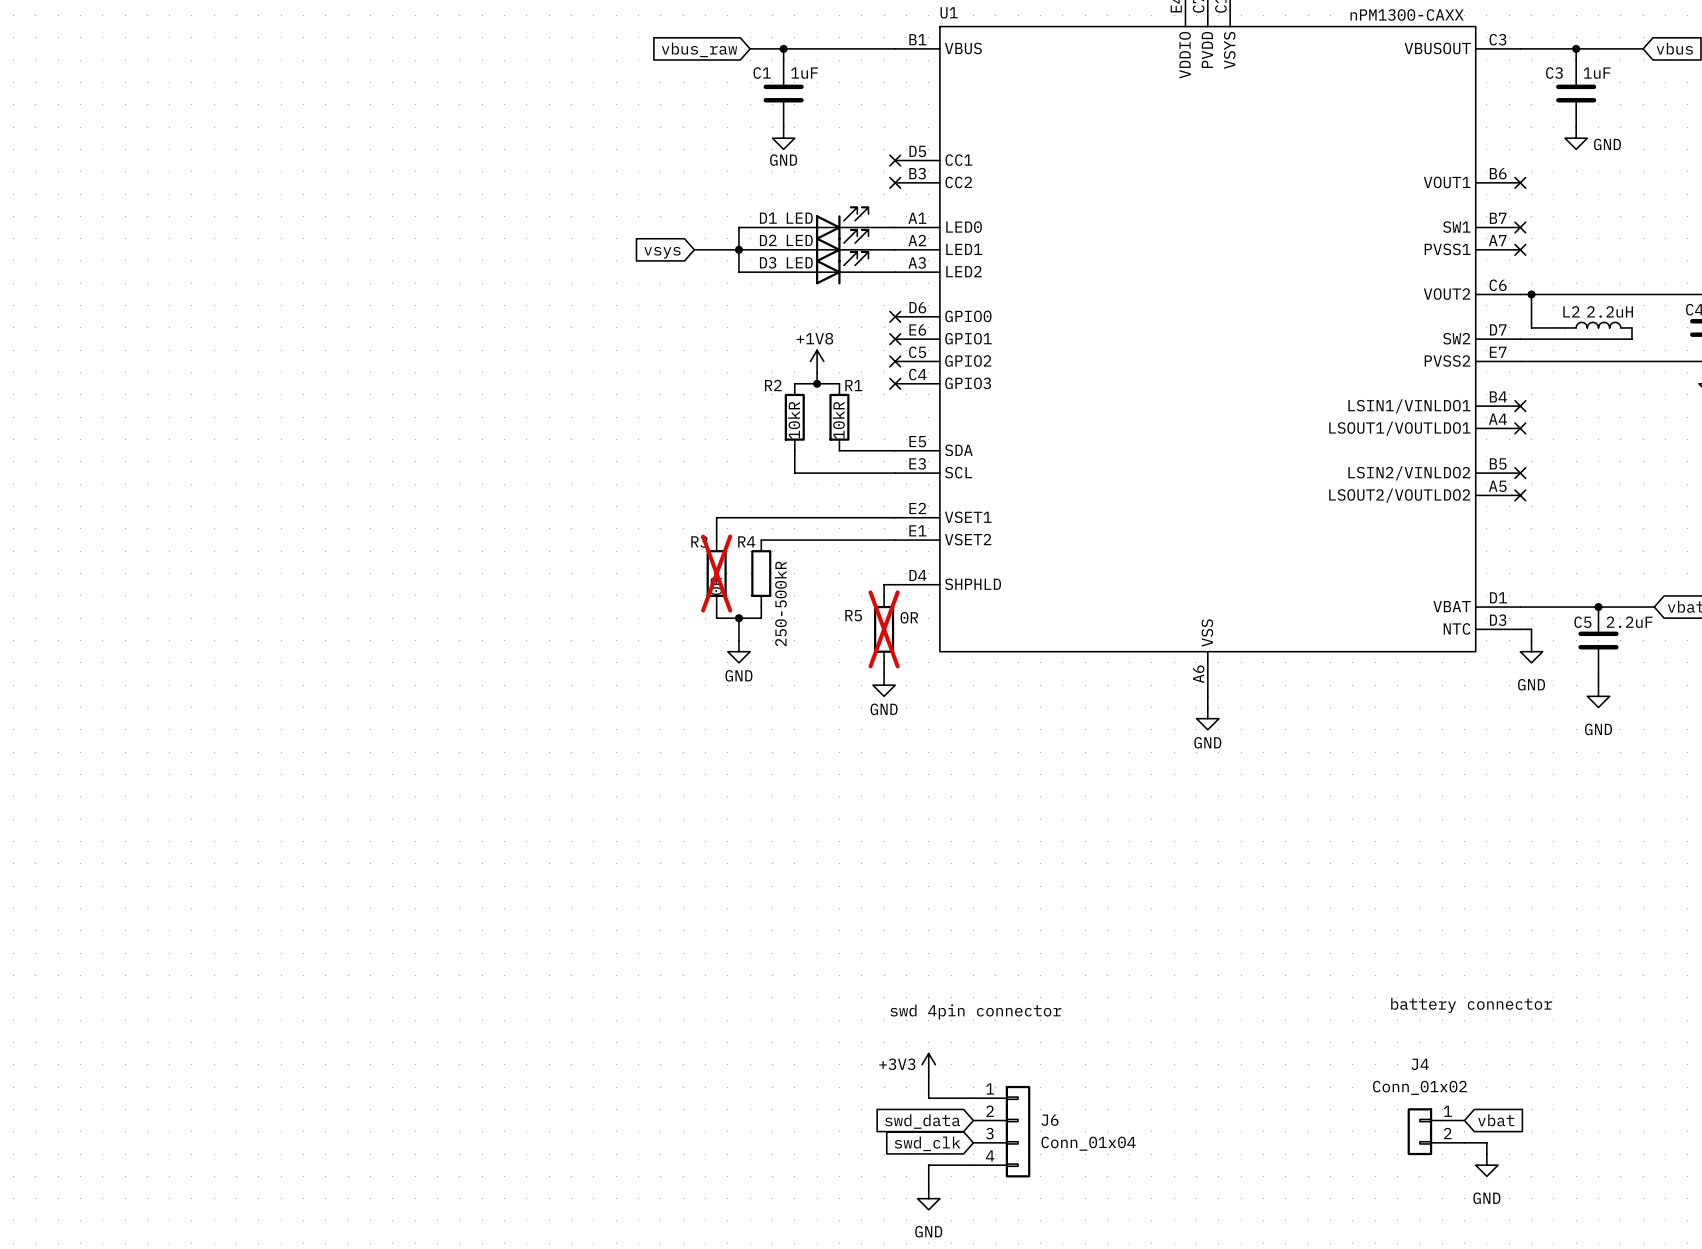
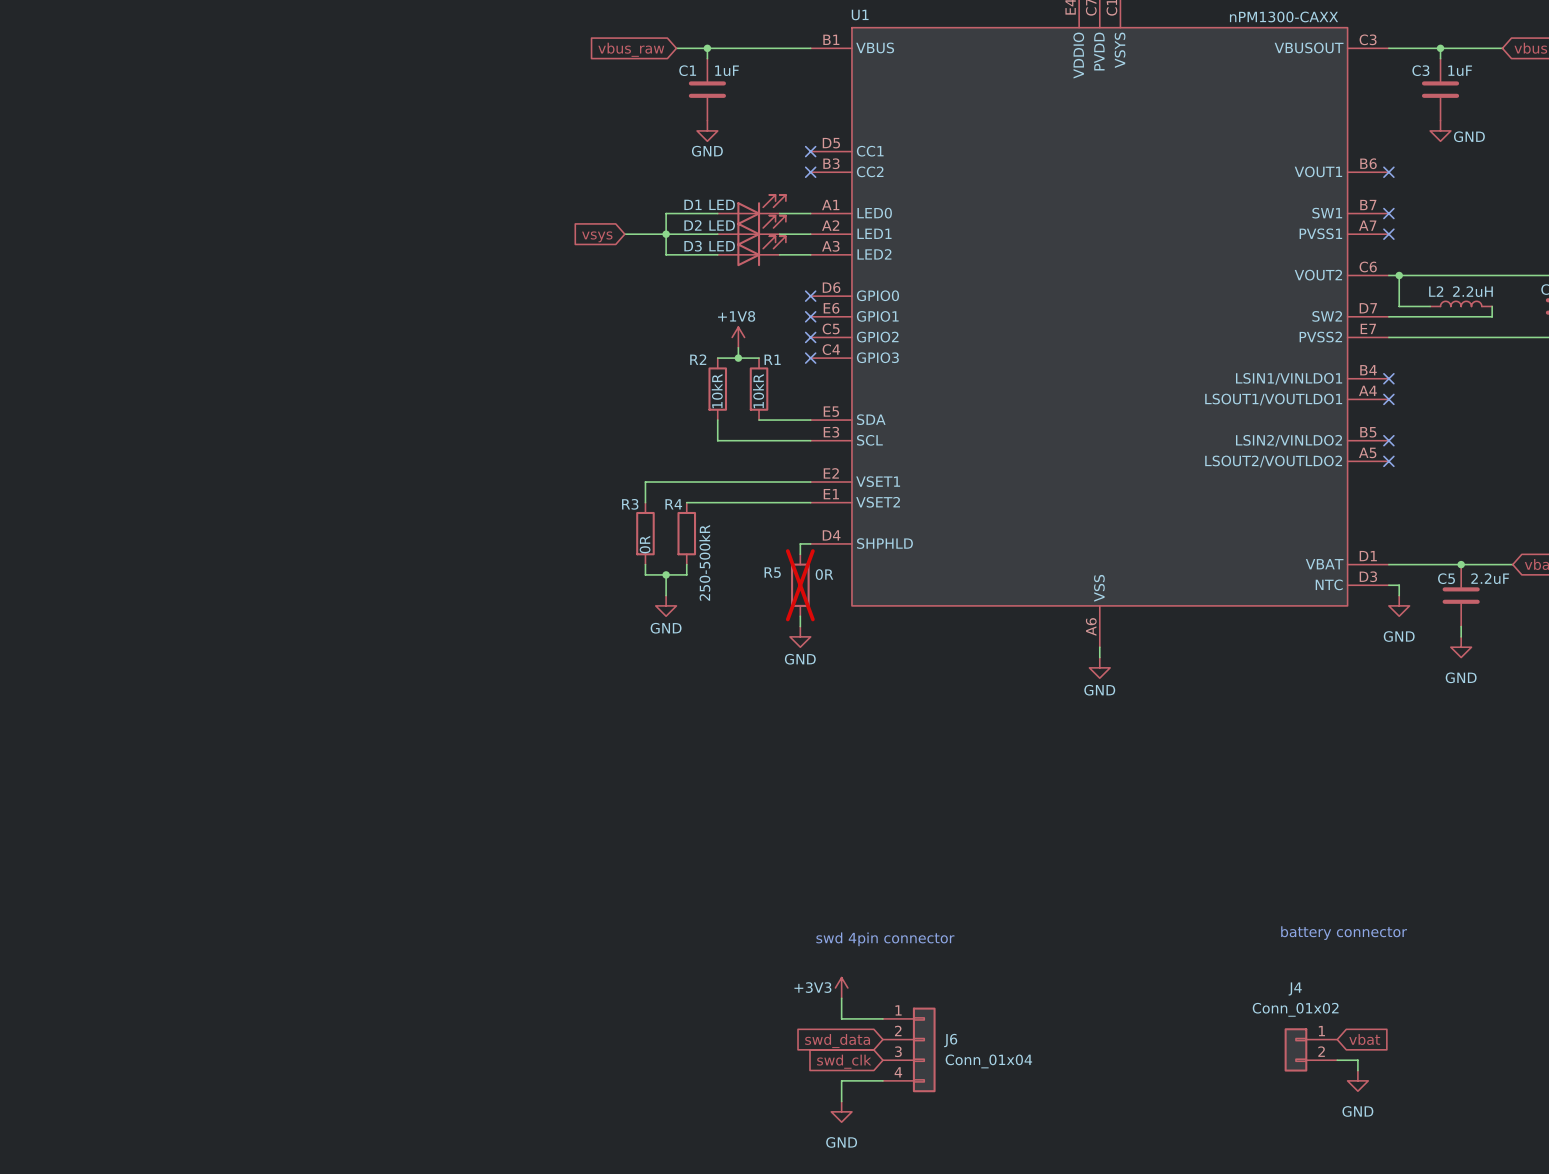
R3 do-not-place cross: (716, 573) -> none

